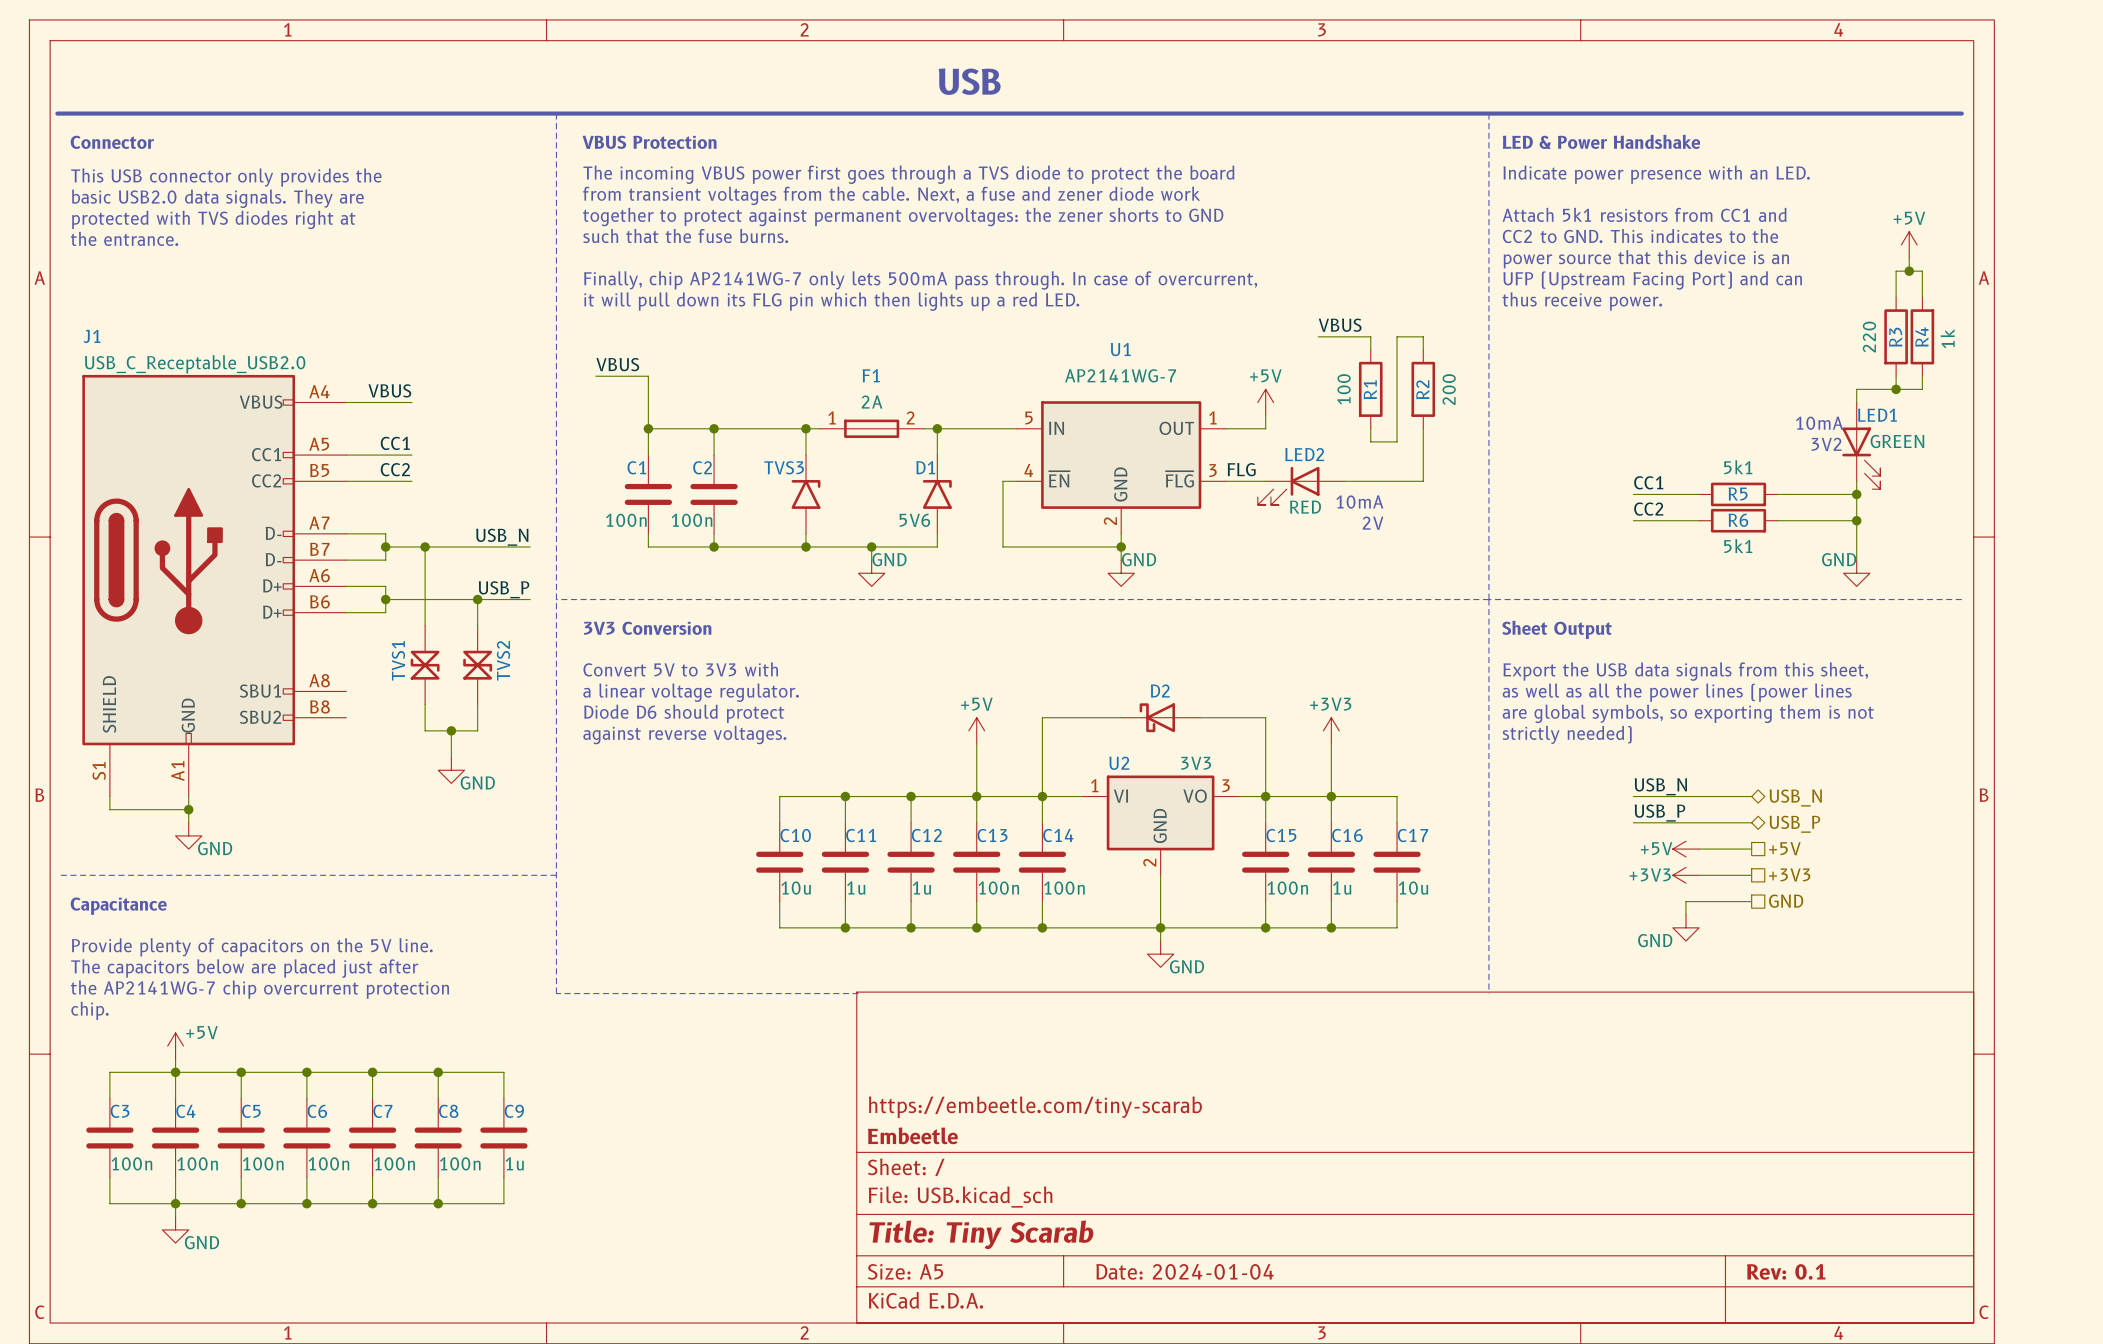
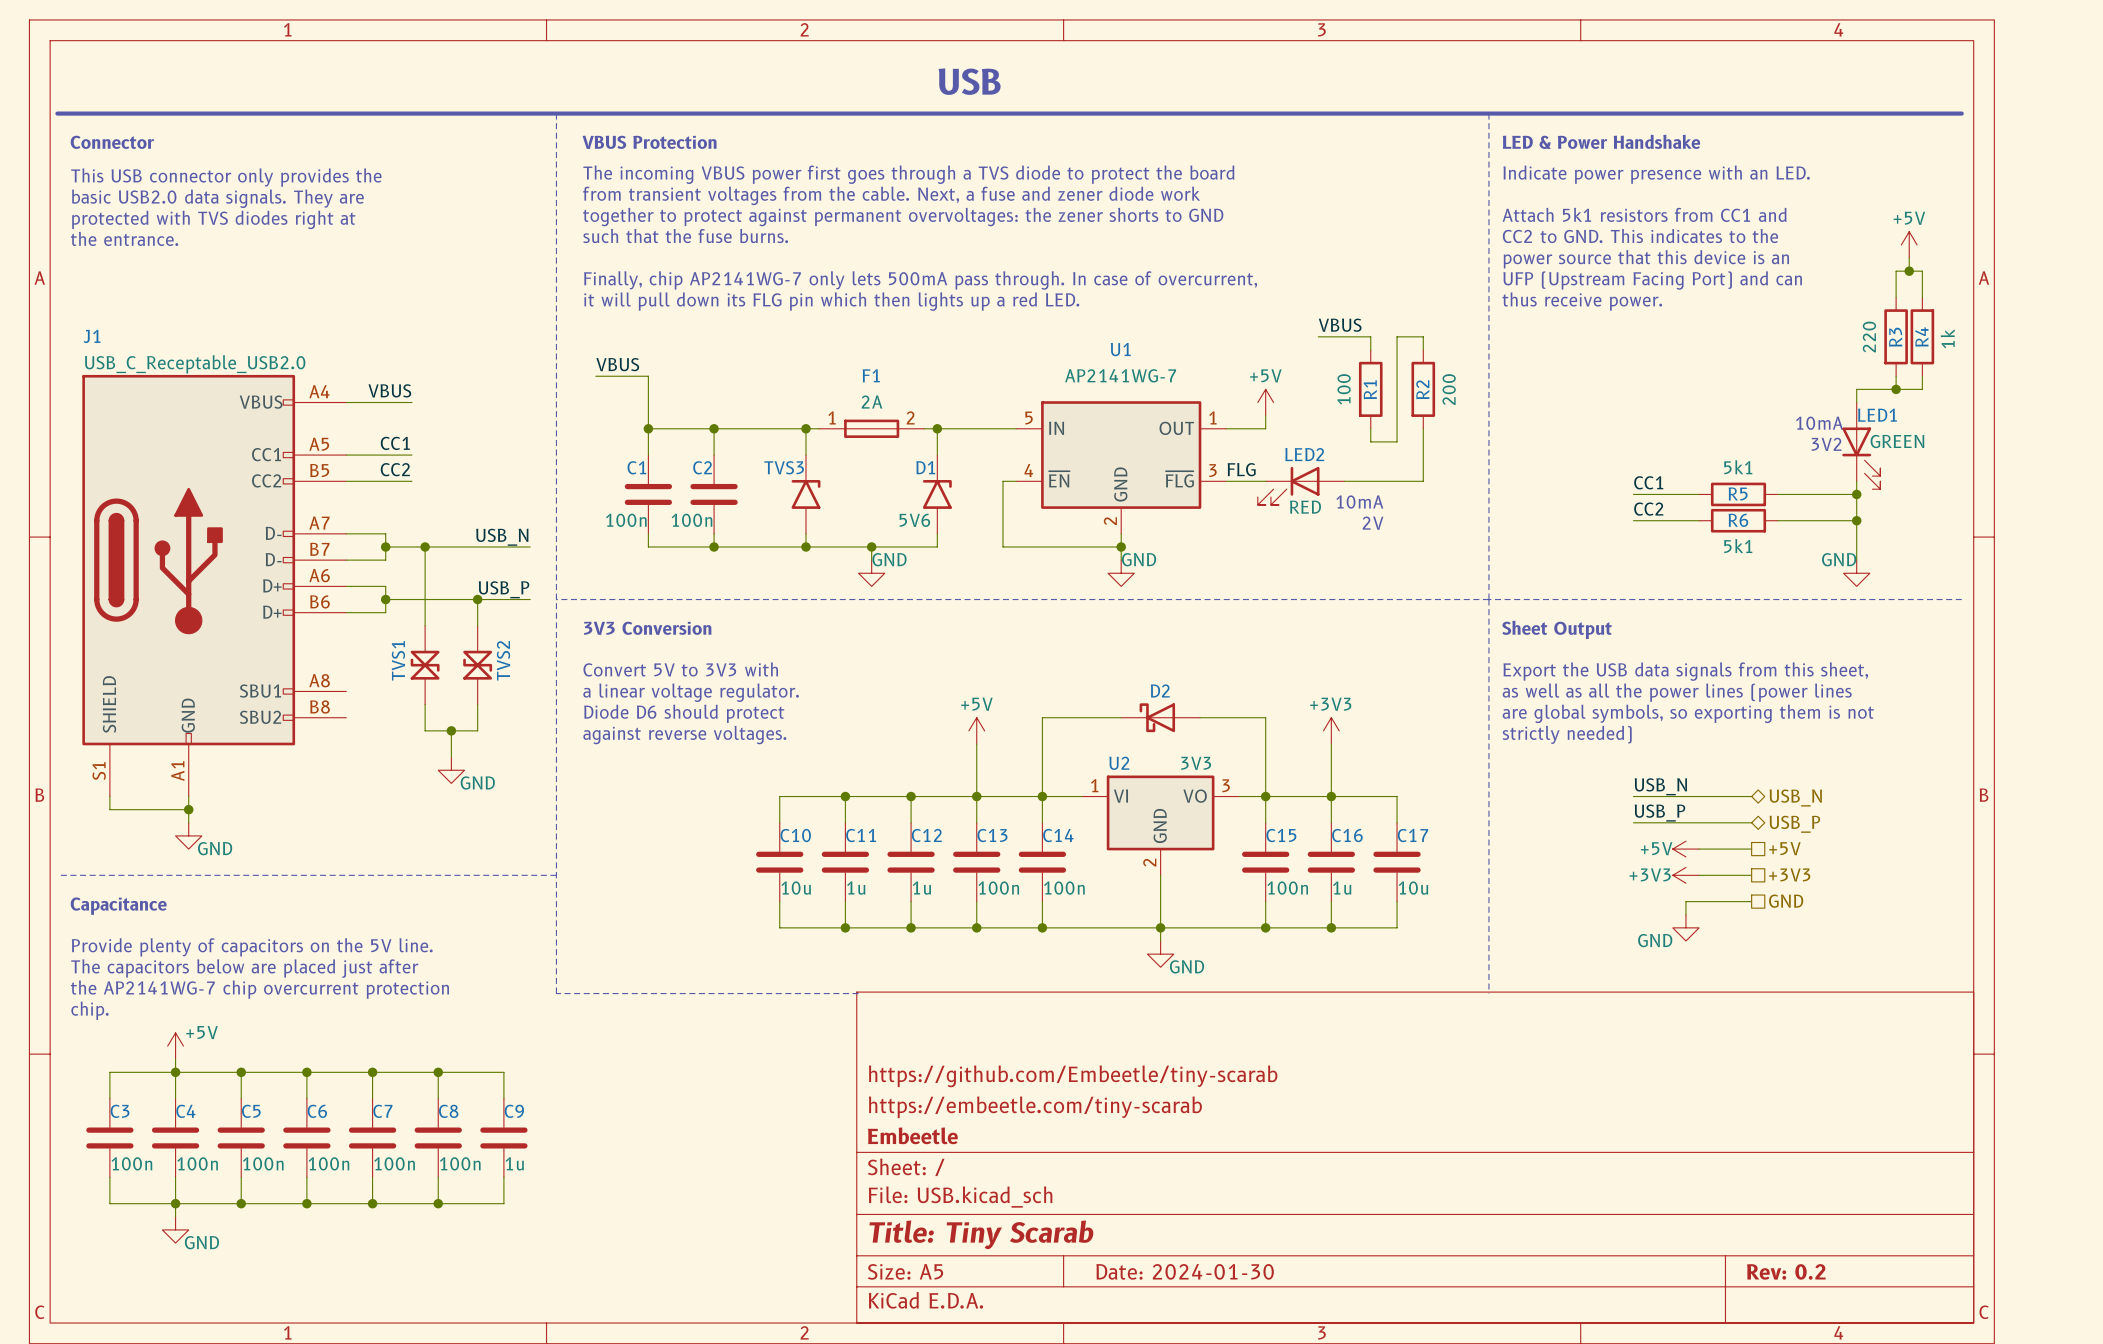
title block: none -> https://github.com/Embeetle/tiny-scarab (1073, 1076)
title block: Date: 2024-01-04 (1185, 1271) -> Date: 2024-01-30 (1185, 1271)
title block: Rev: 0.1 (1786, 1271) -> Rev: 0.2 (1786, 1271)

